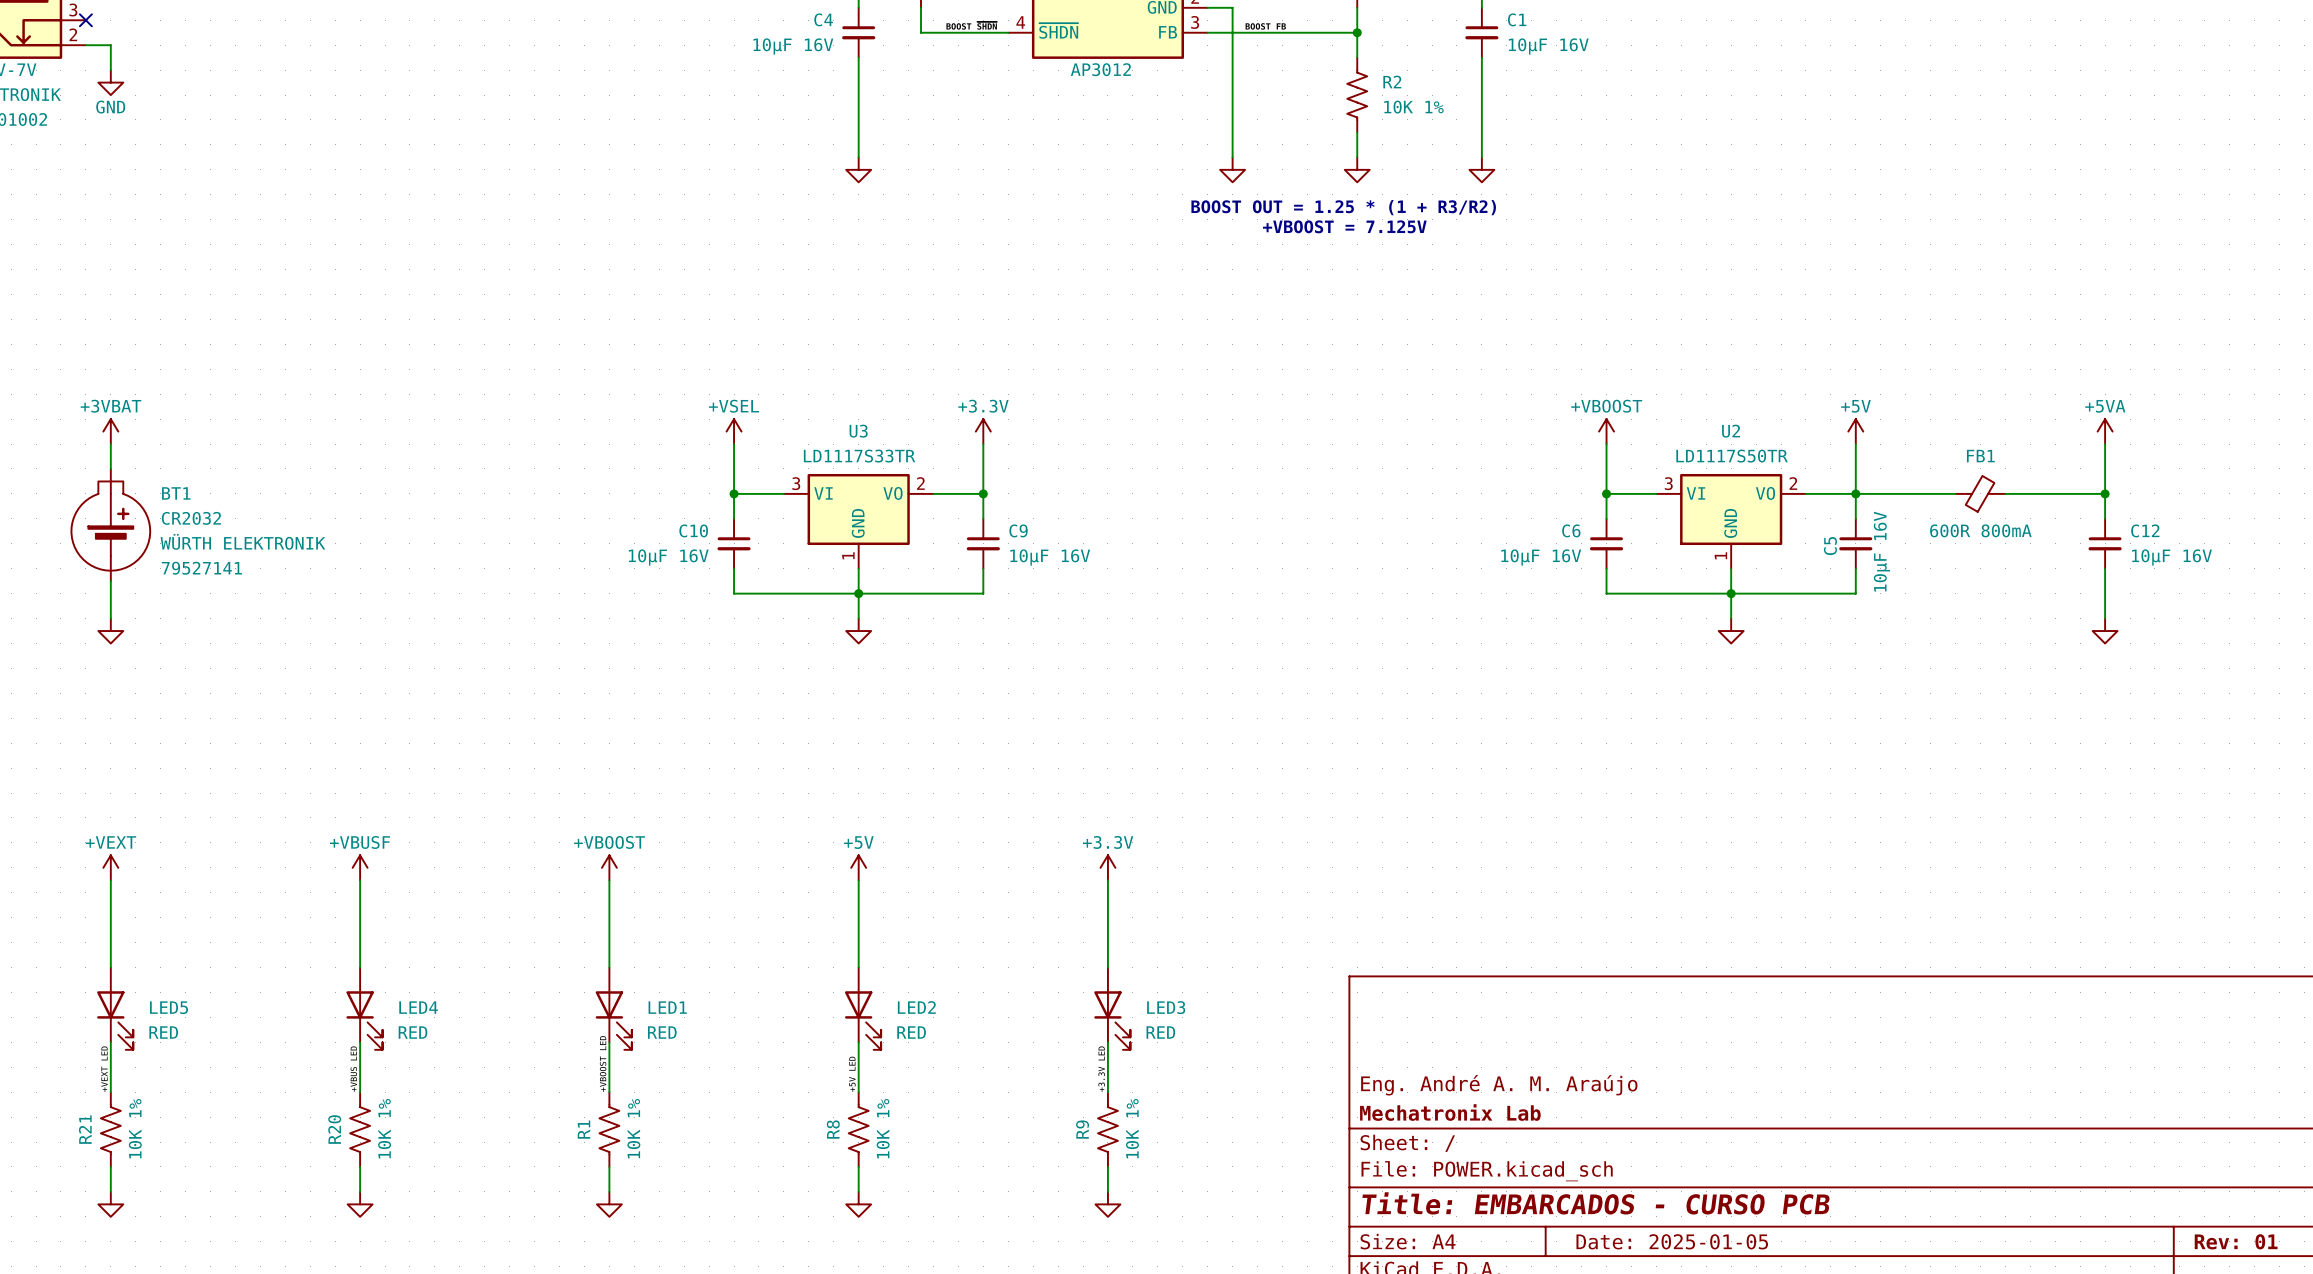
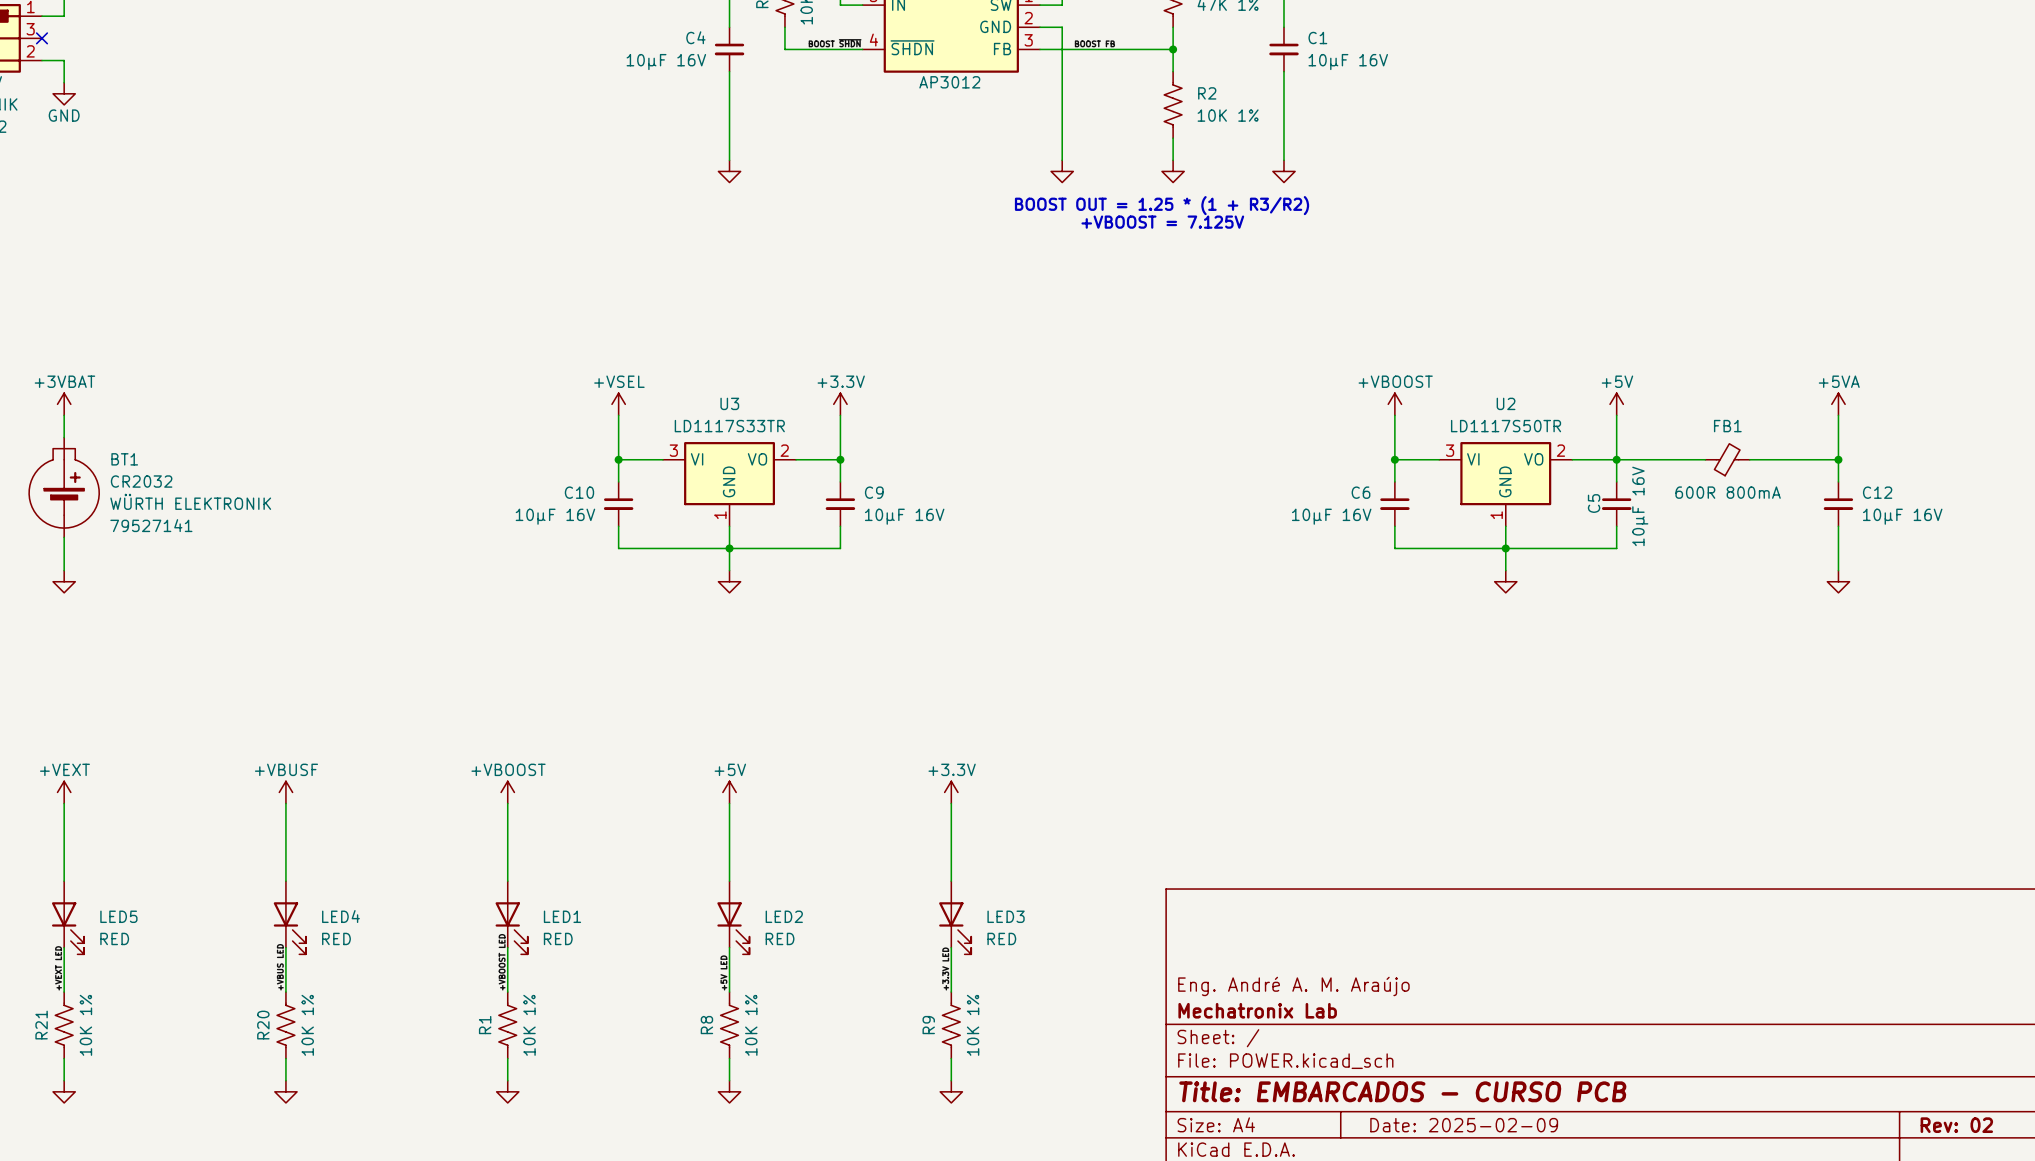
title block: Date: 2025-01-05 (1672, 1241) -> Date: 2025-02-09 (1464, 1125)
title block: Rev: 01 (2236, 1241) -> Rev: 02 (1956, 1125)

